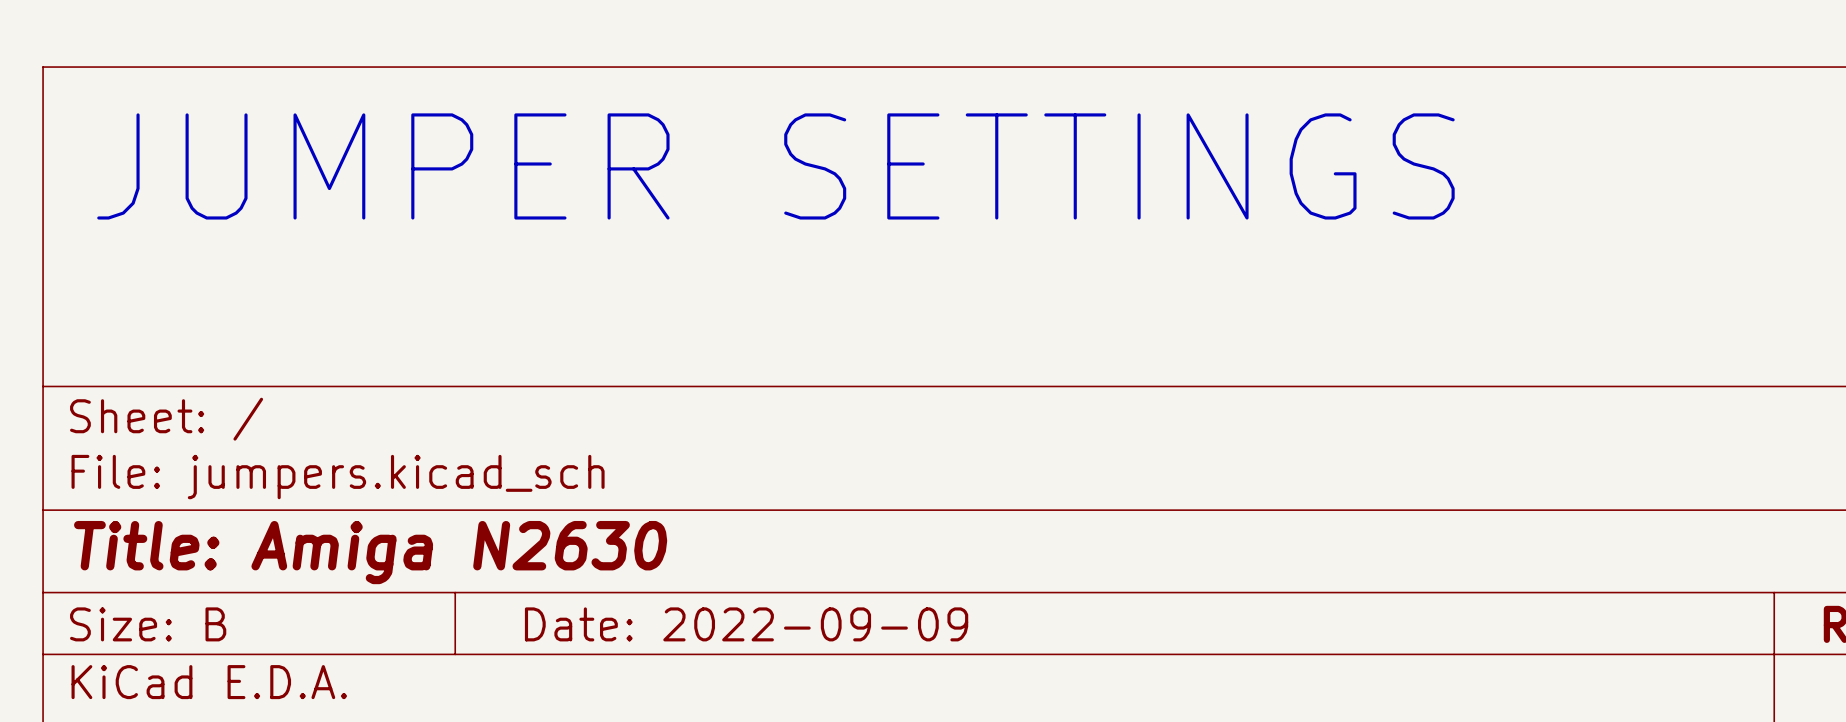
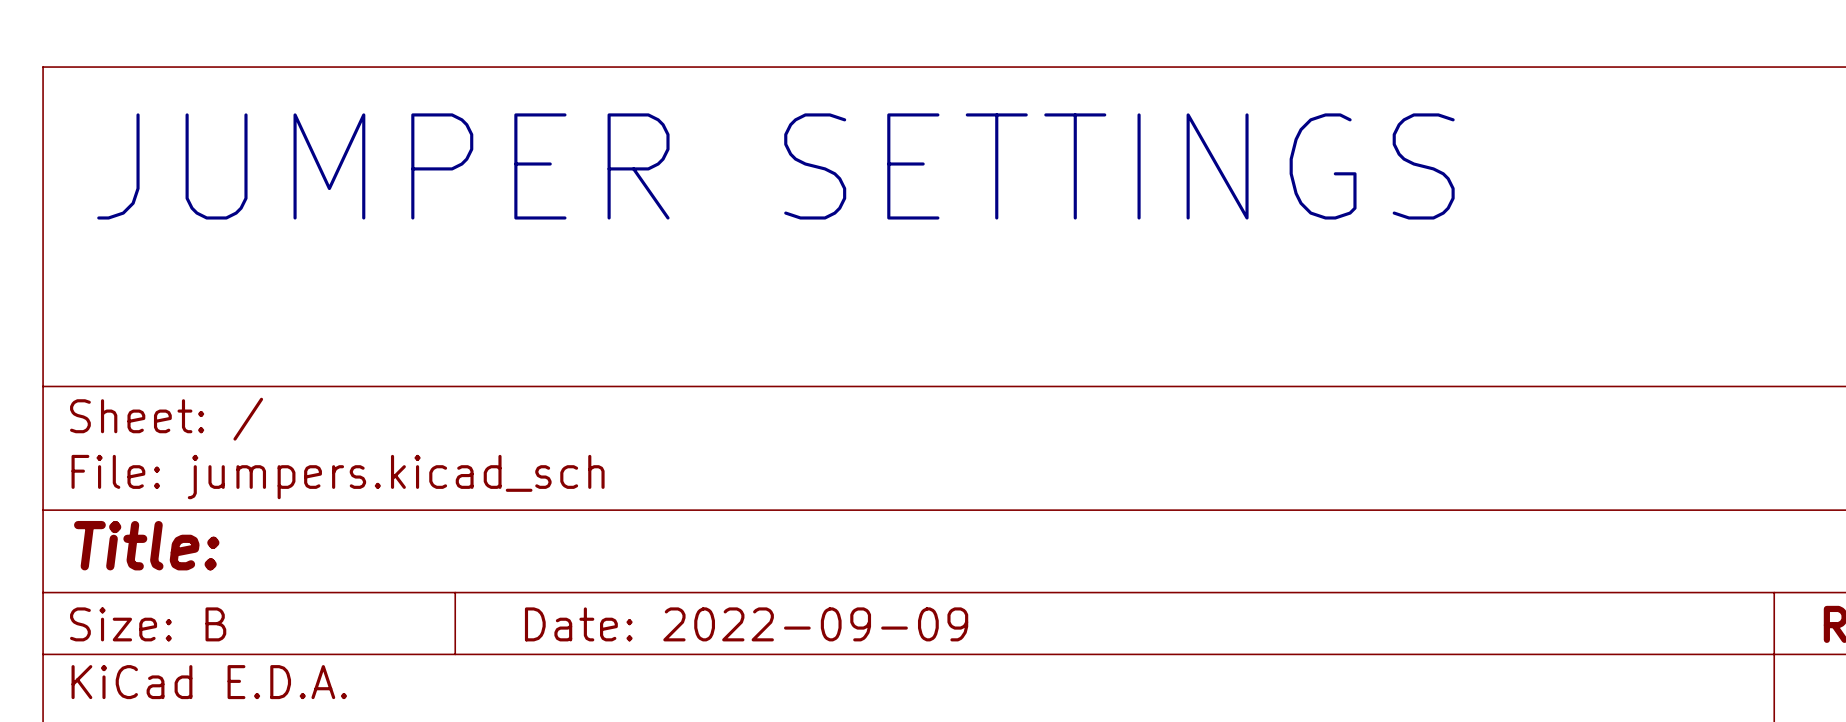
title block: Title: Amiga N2630 (370, 552) -> Title: (146, 545)

